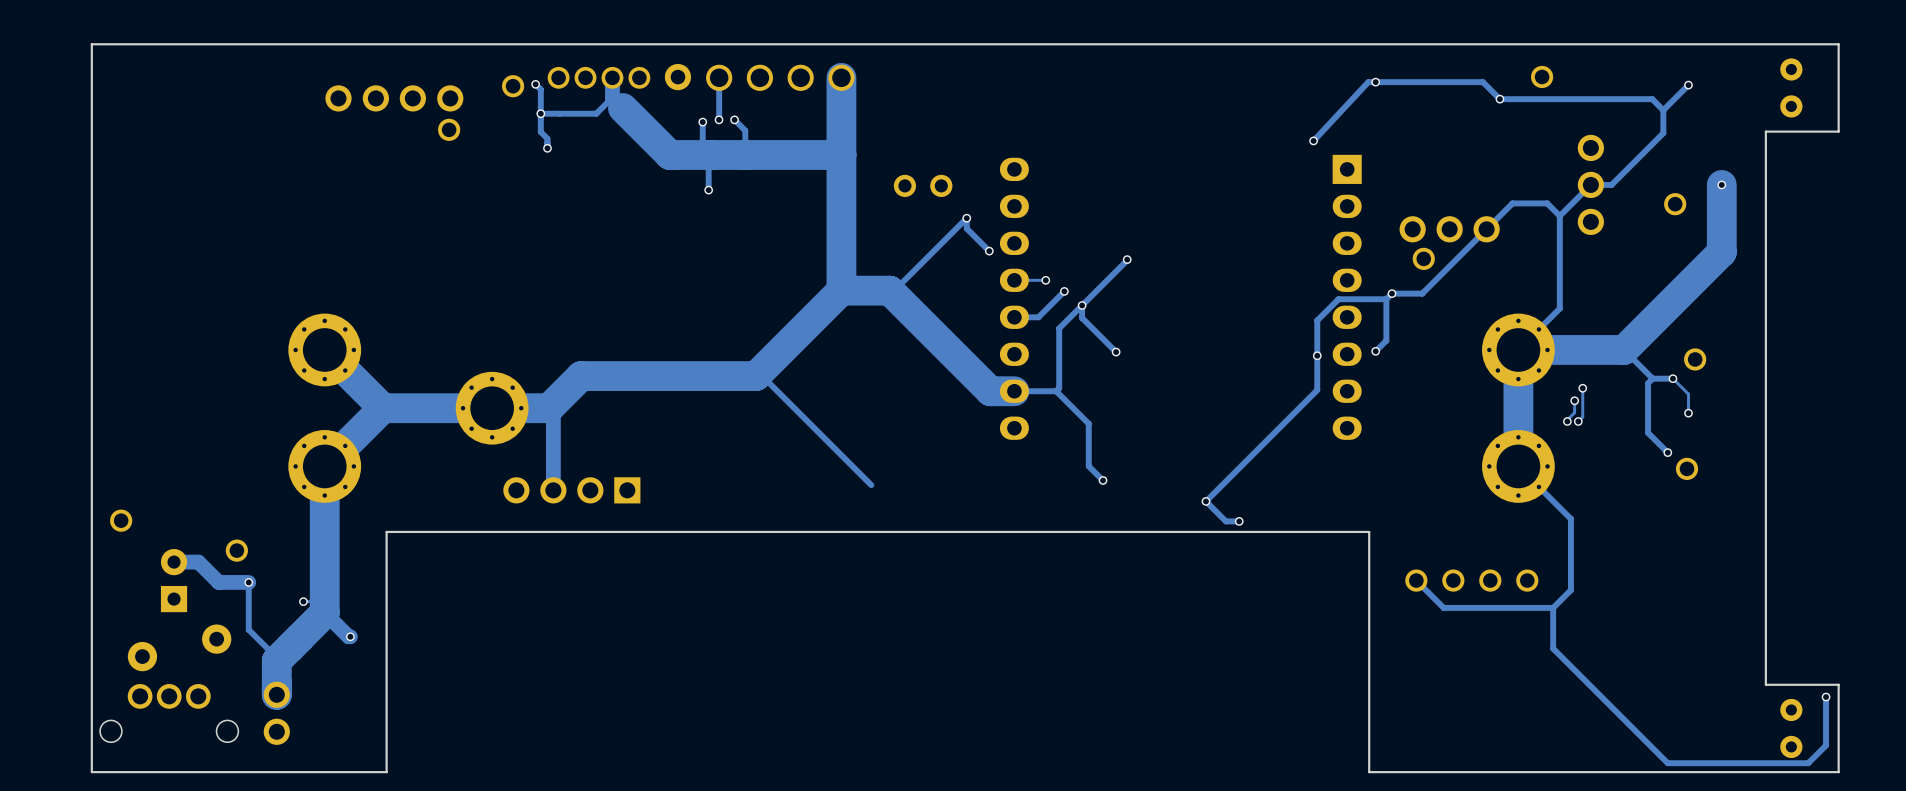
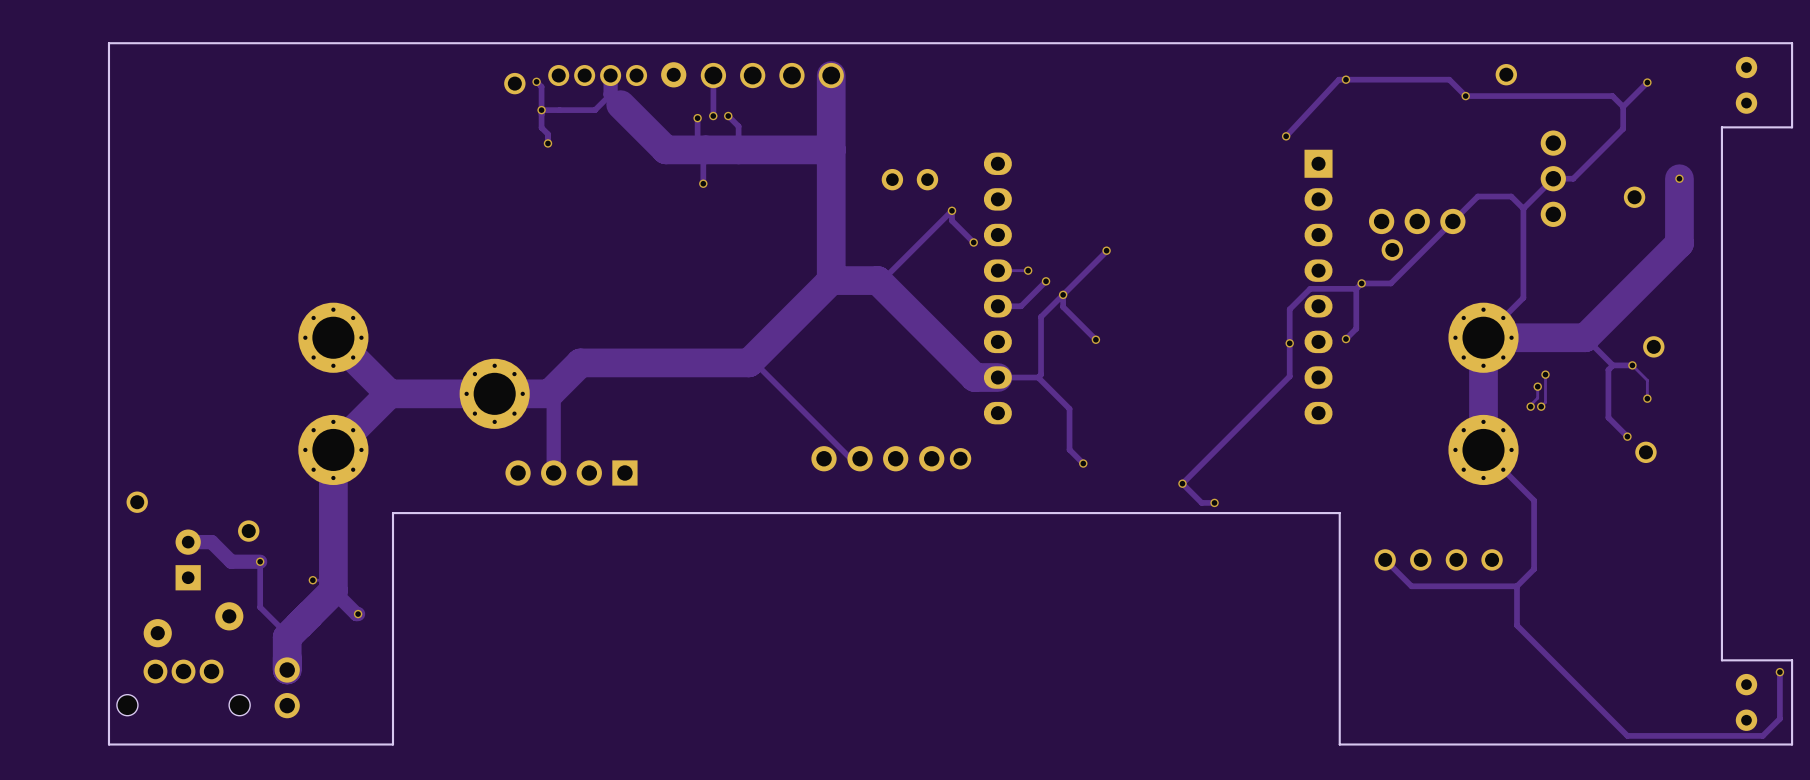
part: (394, 98) -> none
part: (449, 129) -> none
part: none -> (877, 458)
part: none -> (960, 458)

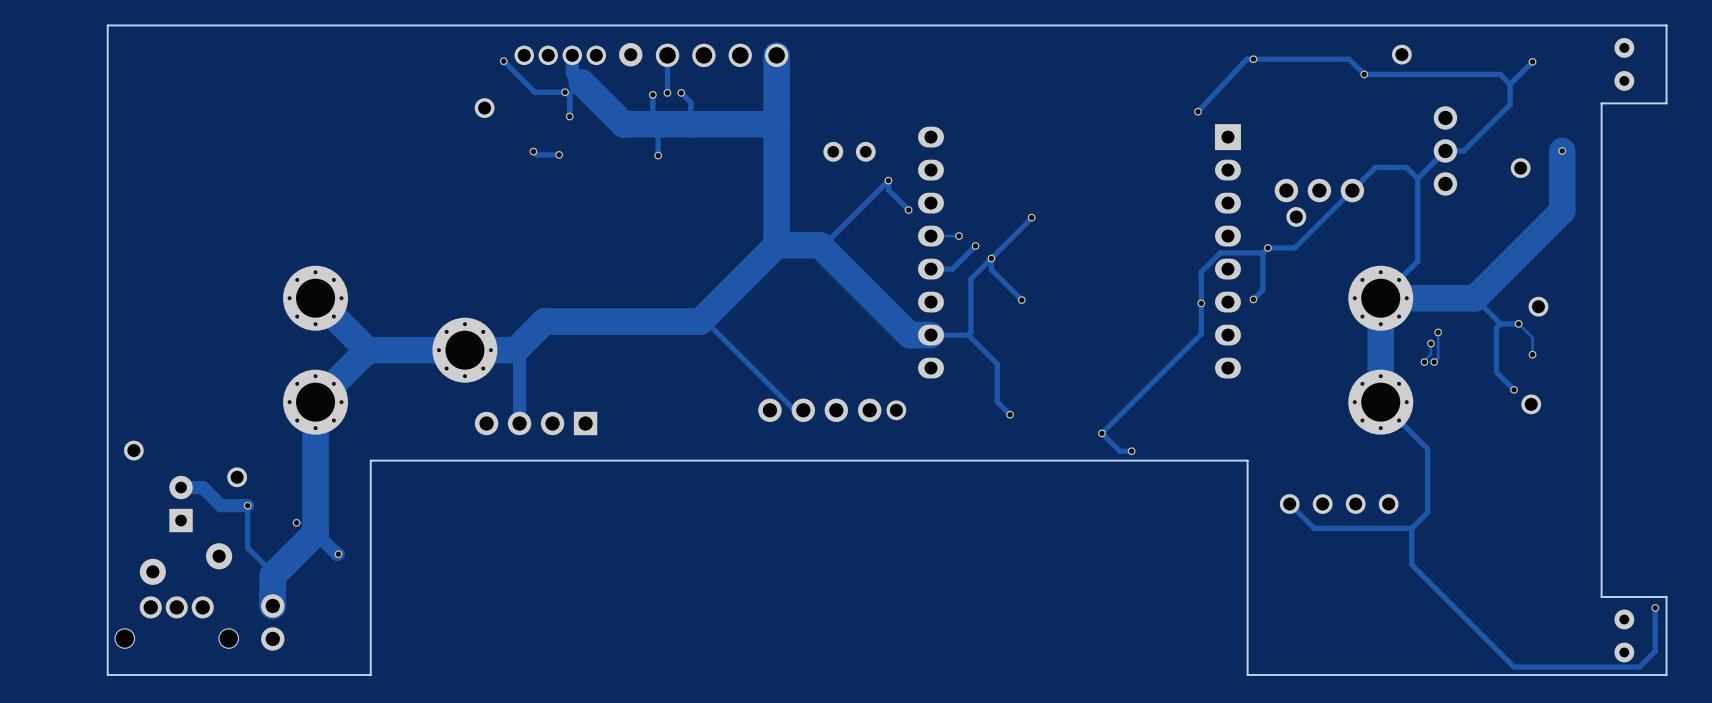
part position: (514, 83) -> (484, 108)
track: (541, 86) (541, 127) (547, 134) (547, 143) -> (508, 65) (534, 92) (565, 92) (569, 96)
track: (610, 94) (595, 110) (541, 110) -> none
via: (541, 110) -> none
track: none -> (576, 87) (569, 94) (569, 116)
via: none -> (565, 92)
via: none -> (569, 116)
via: (547, 143) -> none
track: none -> (533, 151) (536, 154) (559, 154)
via: none -> (533, 151)
via: none -> (559, 154)

